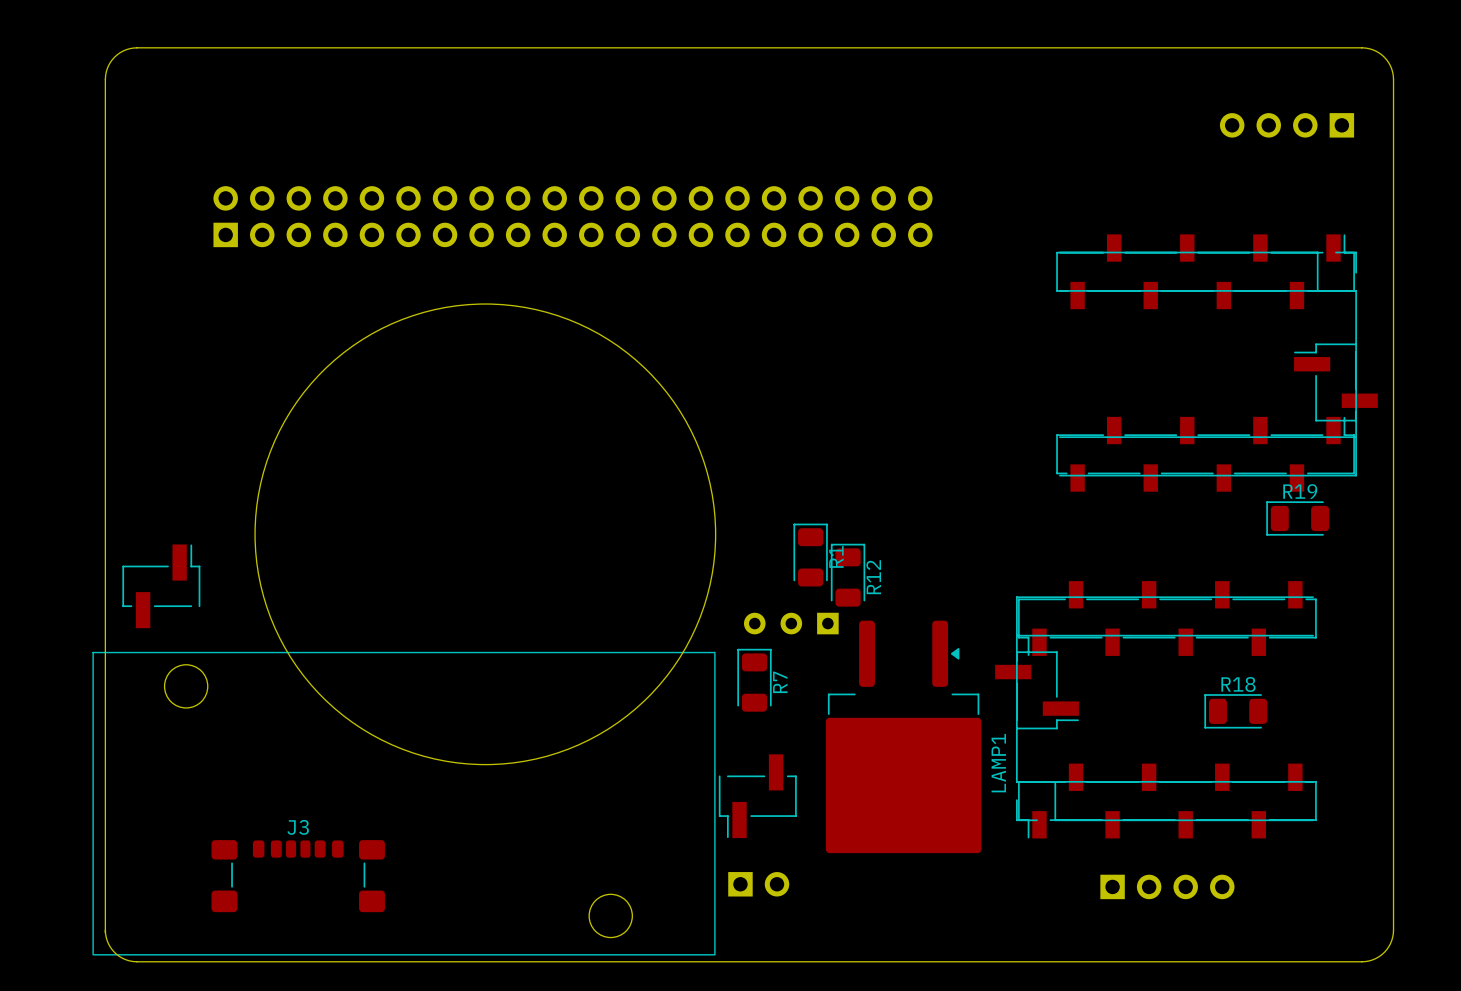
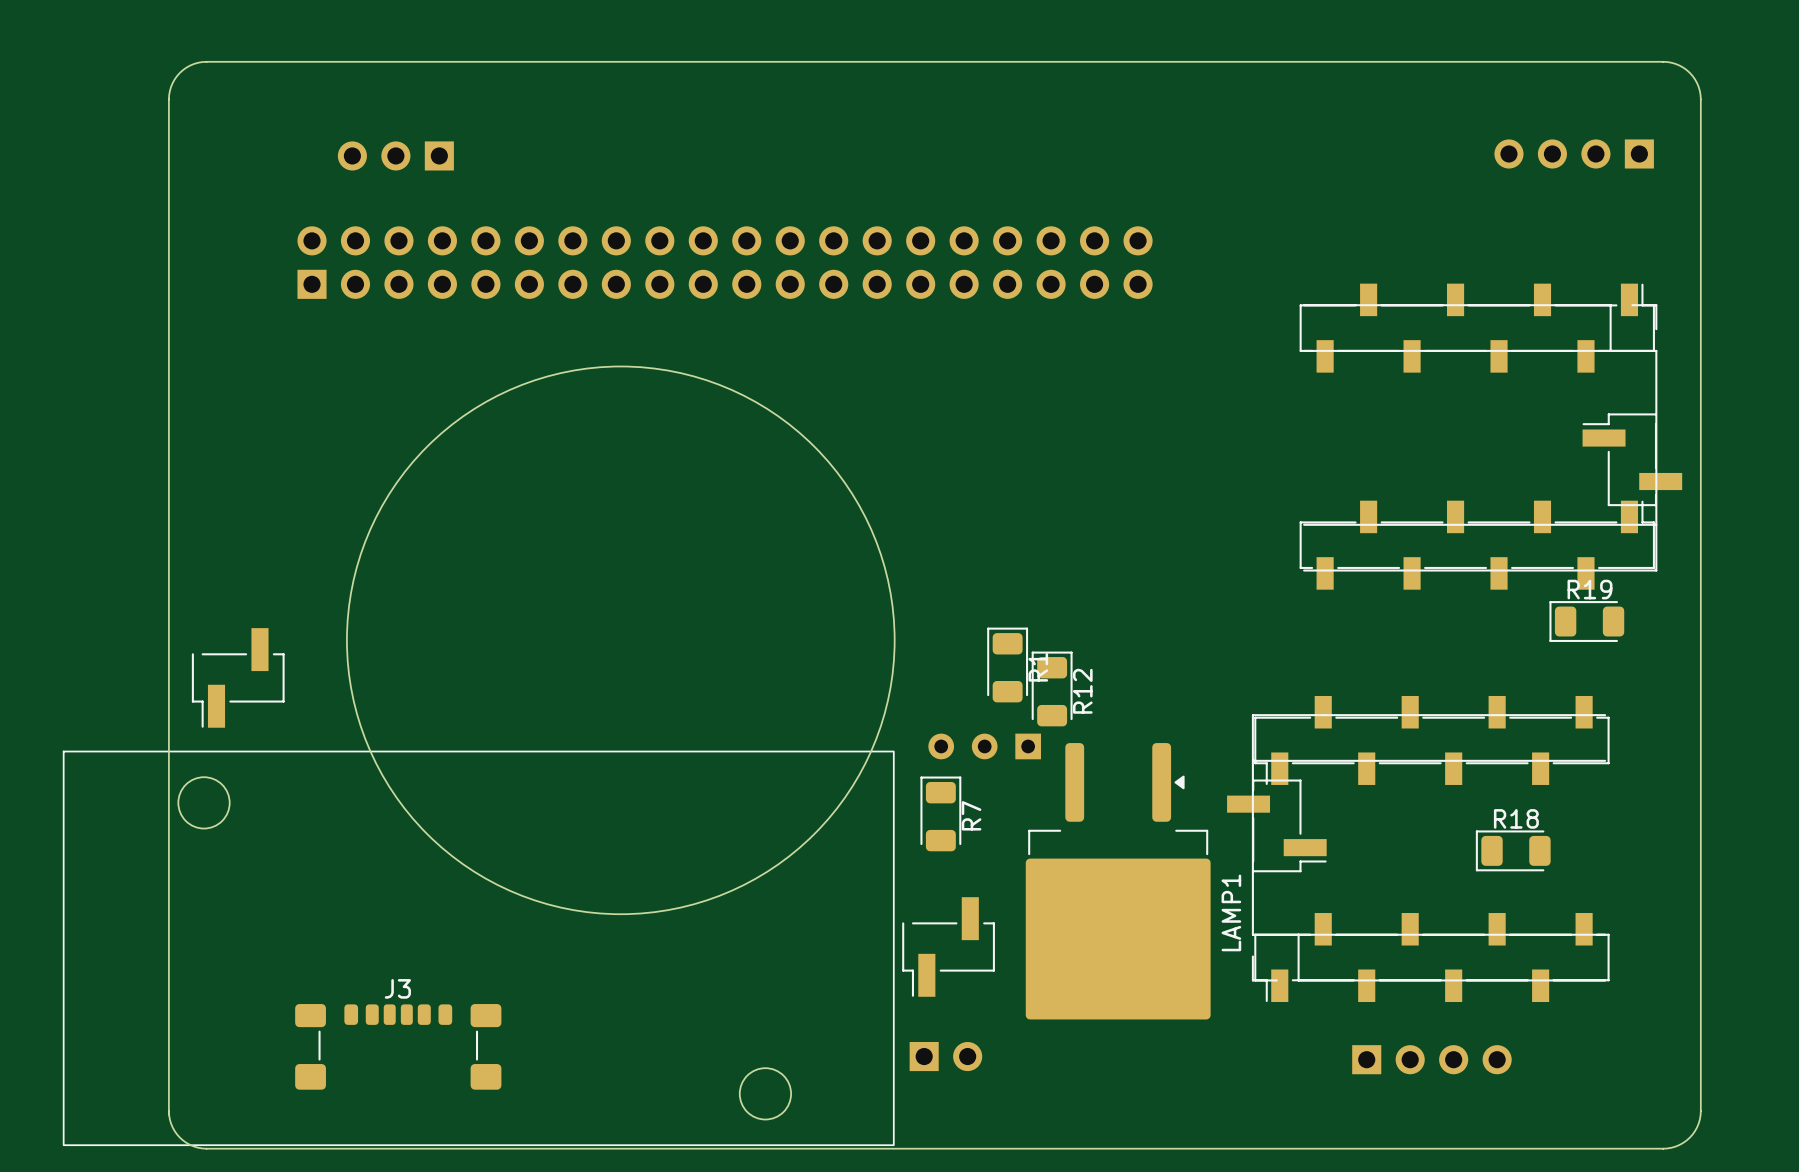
part: none -> (395, 155)
part: none -> (528, 887)
part: (444, 749) -> none

